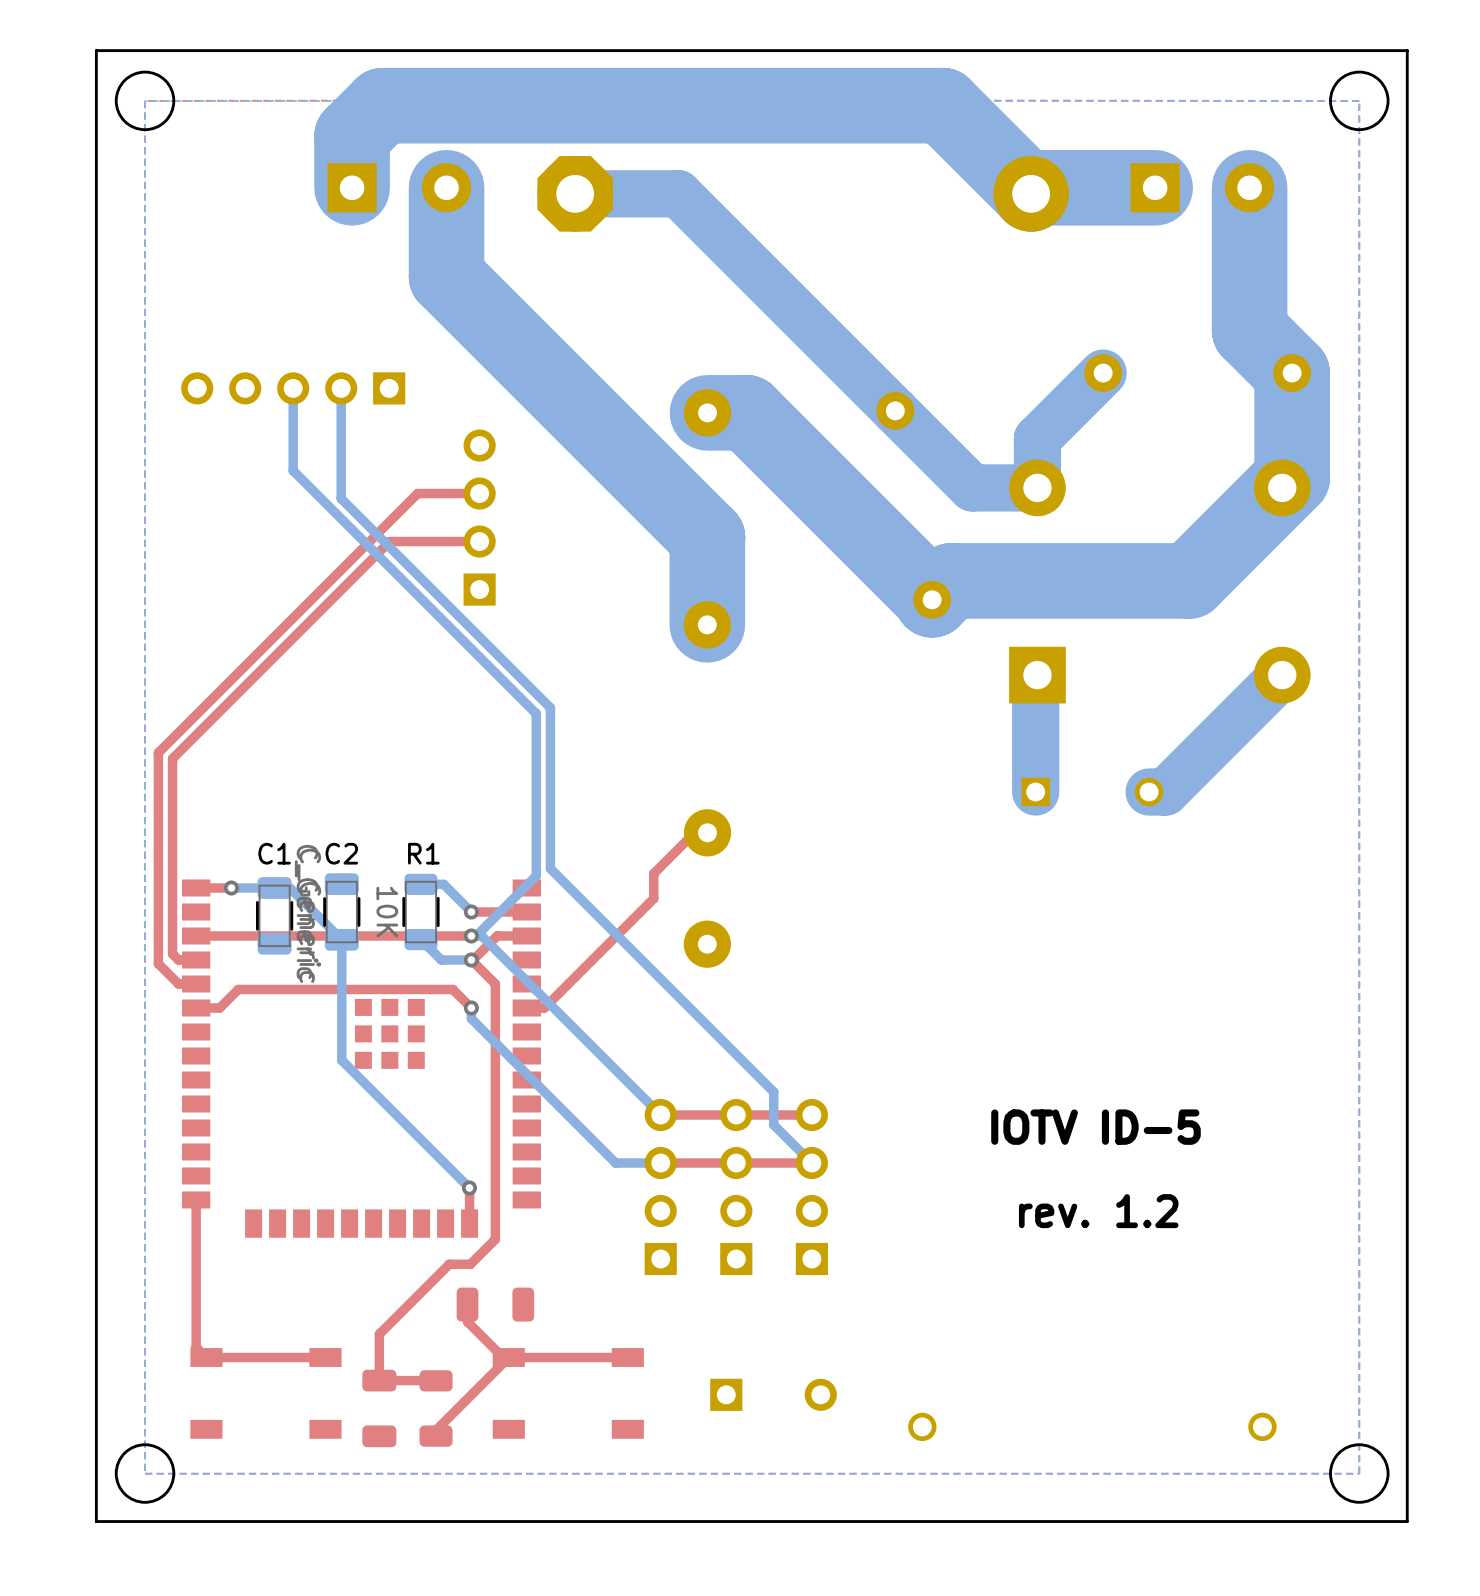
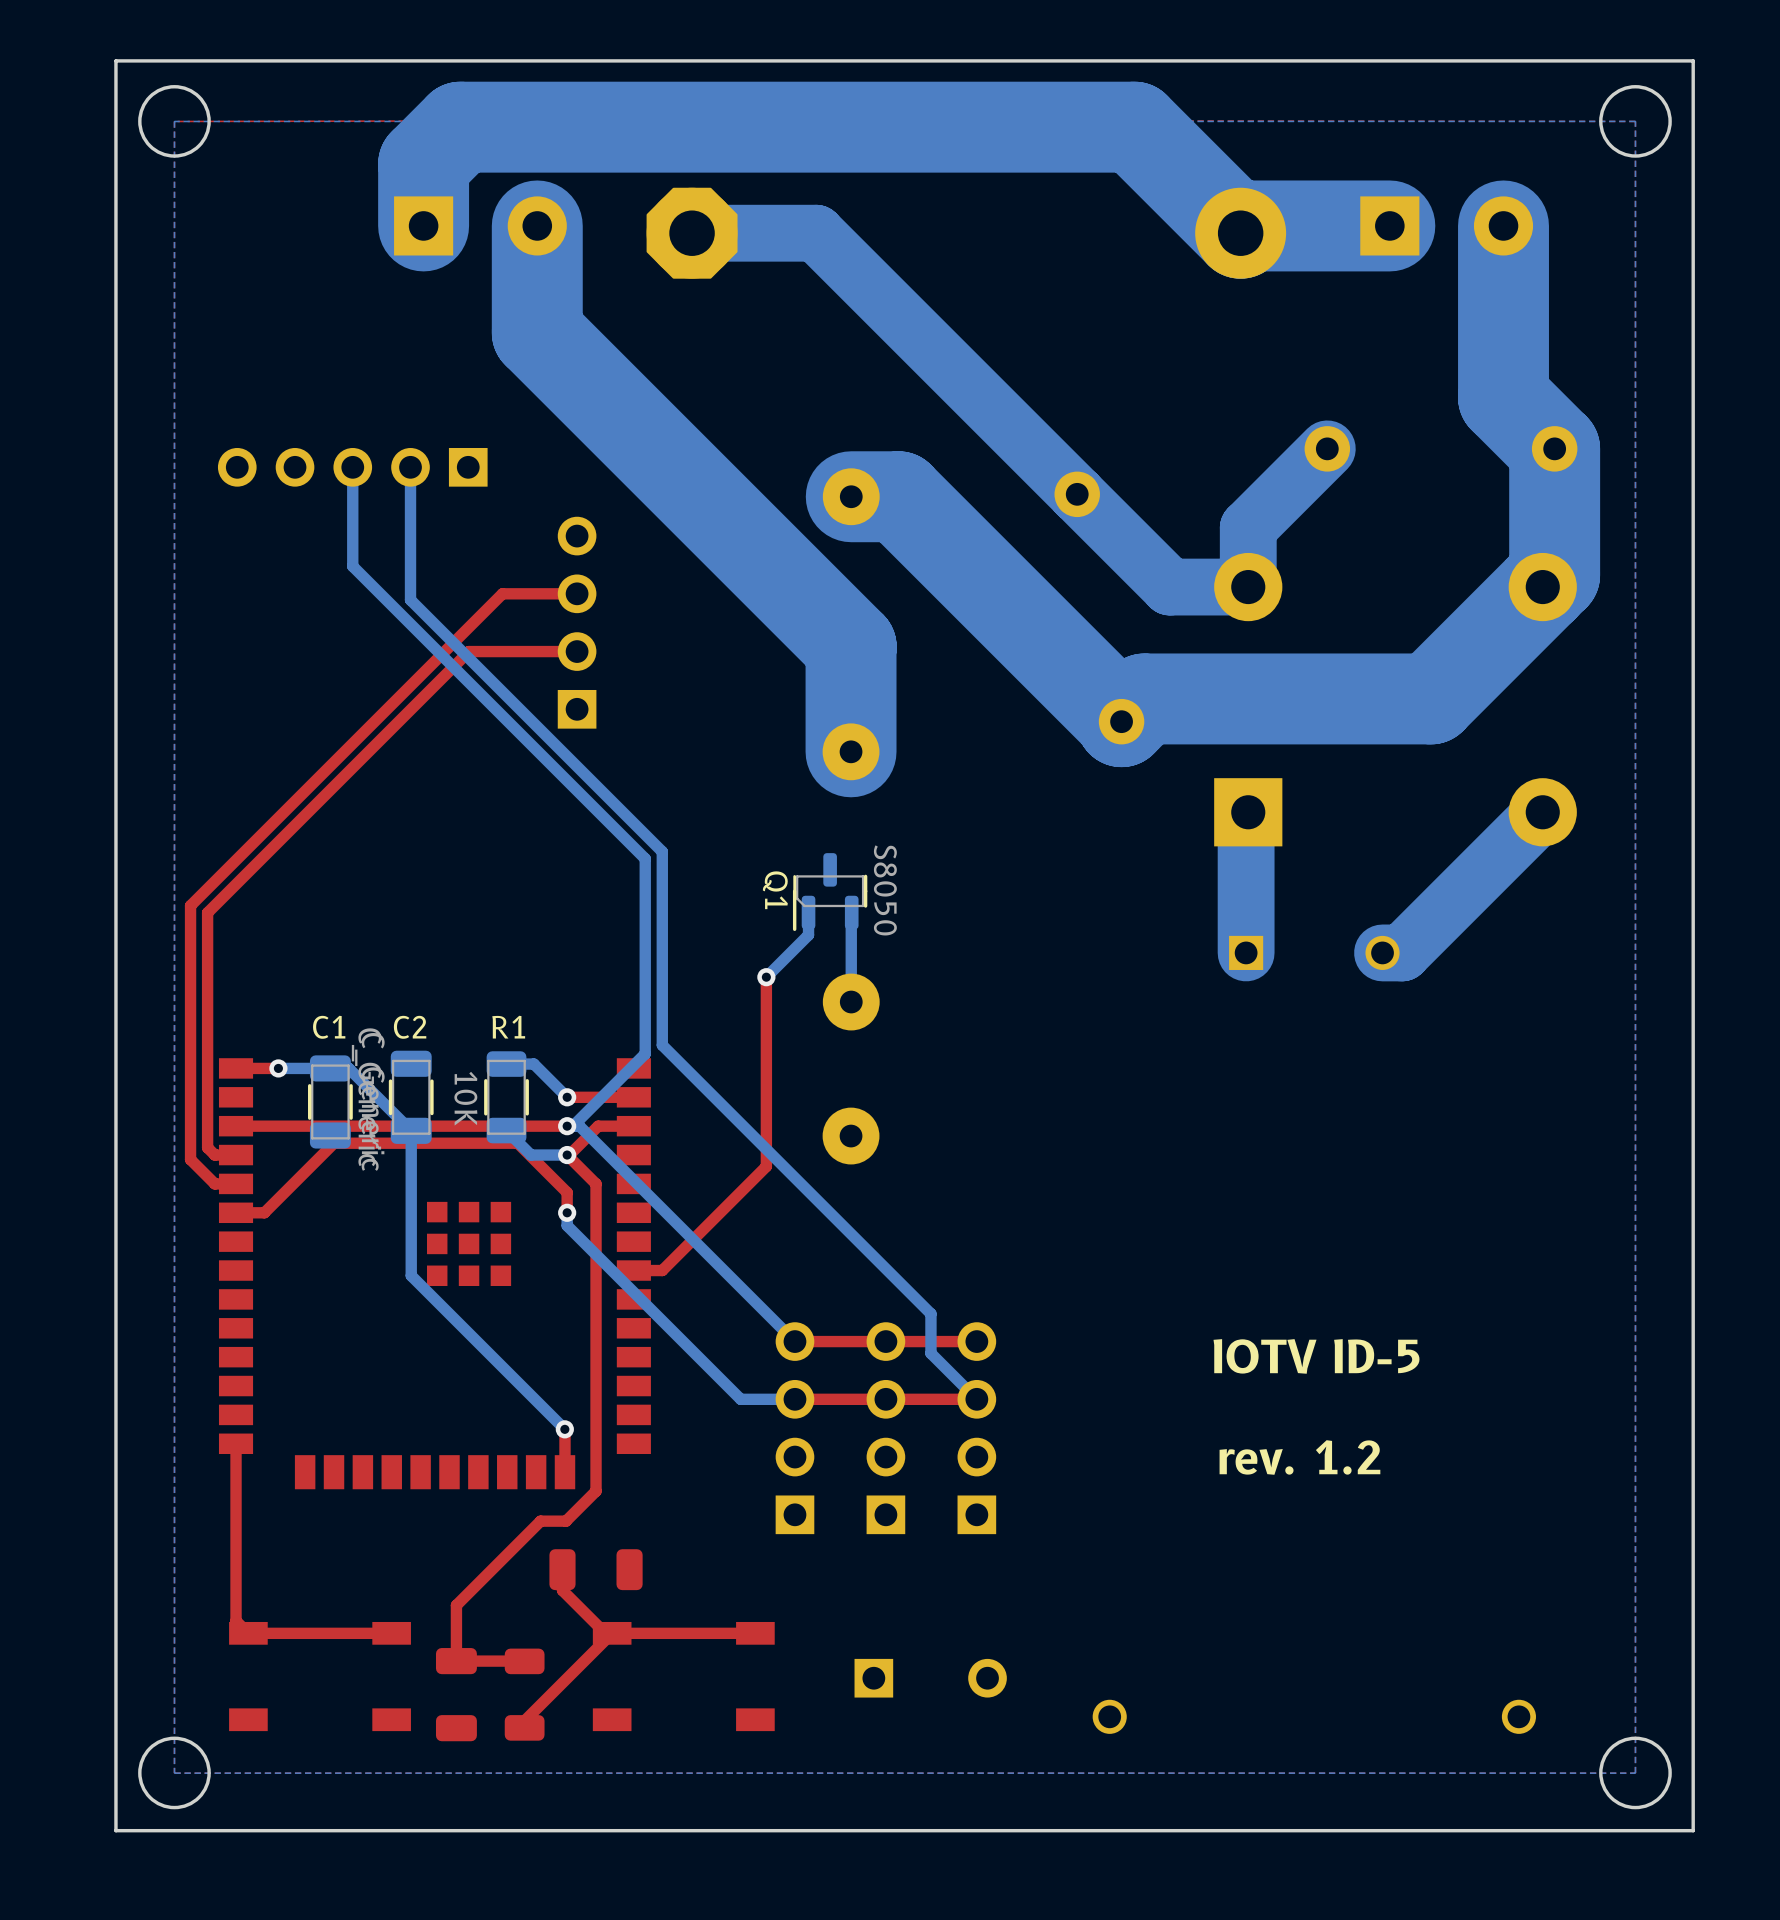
Q1: none -> S8050 (830, 892)
bottom track: none -> (808, 912) (808, 935) (766, 977)
bottom track: none -> (851, 912) (851, 1002)
top track: none -> (766, 977) (766, 1166) (662, 1270) (633, 1270)
via: none -> (766, 977)
top track: (707, 832) (694, 832) (653, 873) (653, 898) (544, 1007) (526, 1007) -> none
top track: (238, 989) (452, 989) (471, 1007) -> (286, 1190) (334, 1143) (517, 1143) (567, 1192) (567, 1212)

